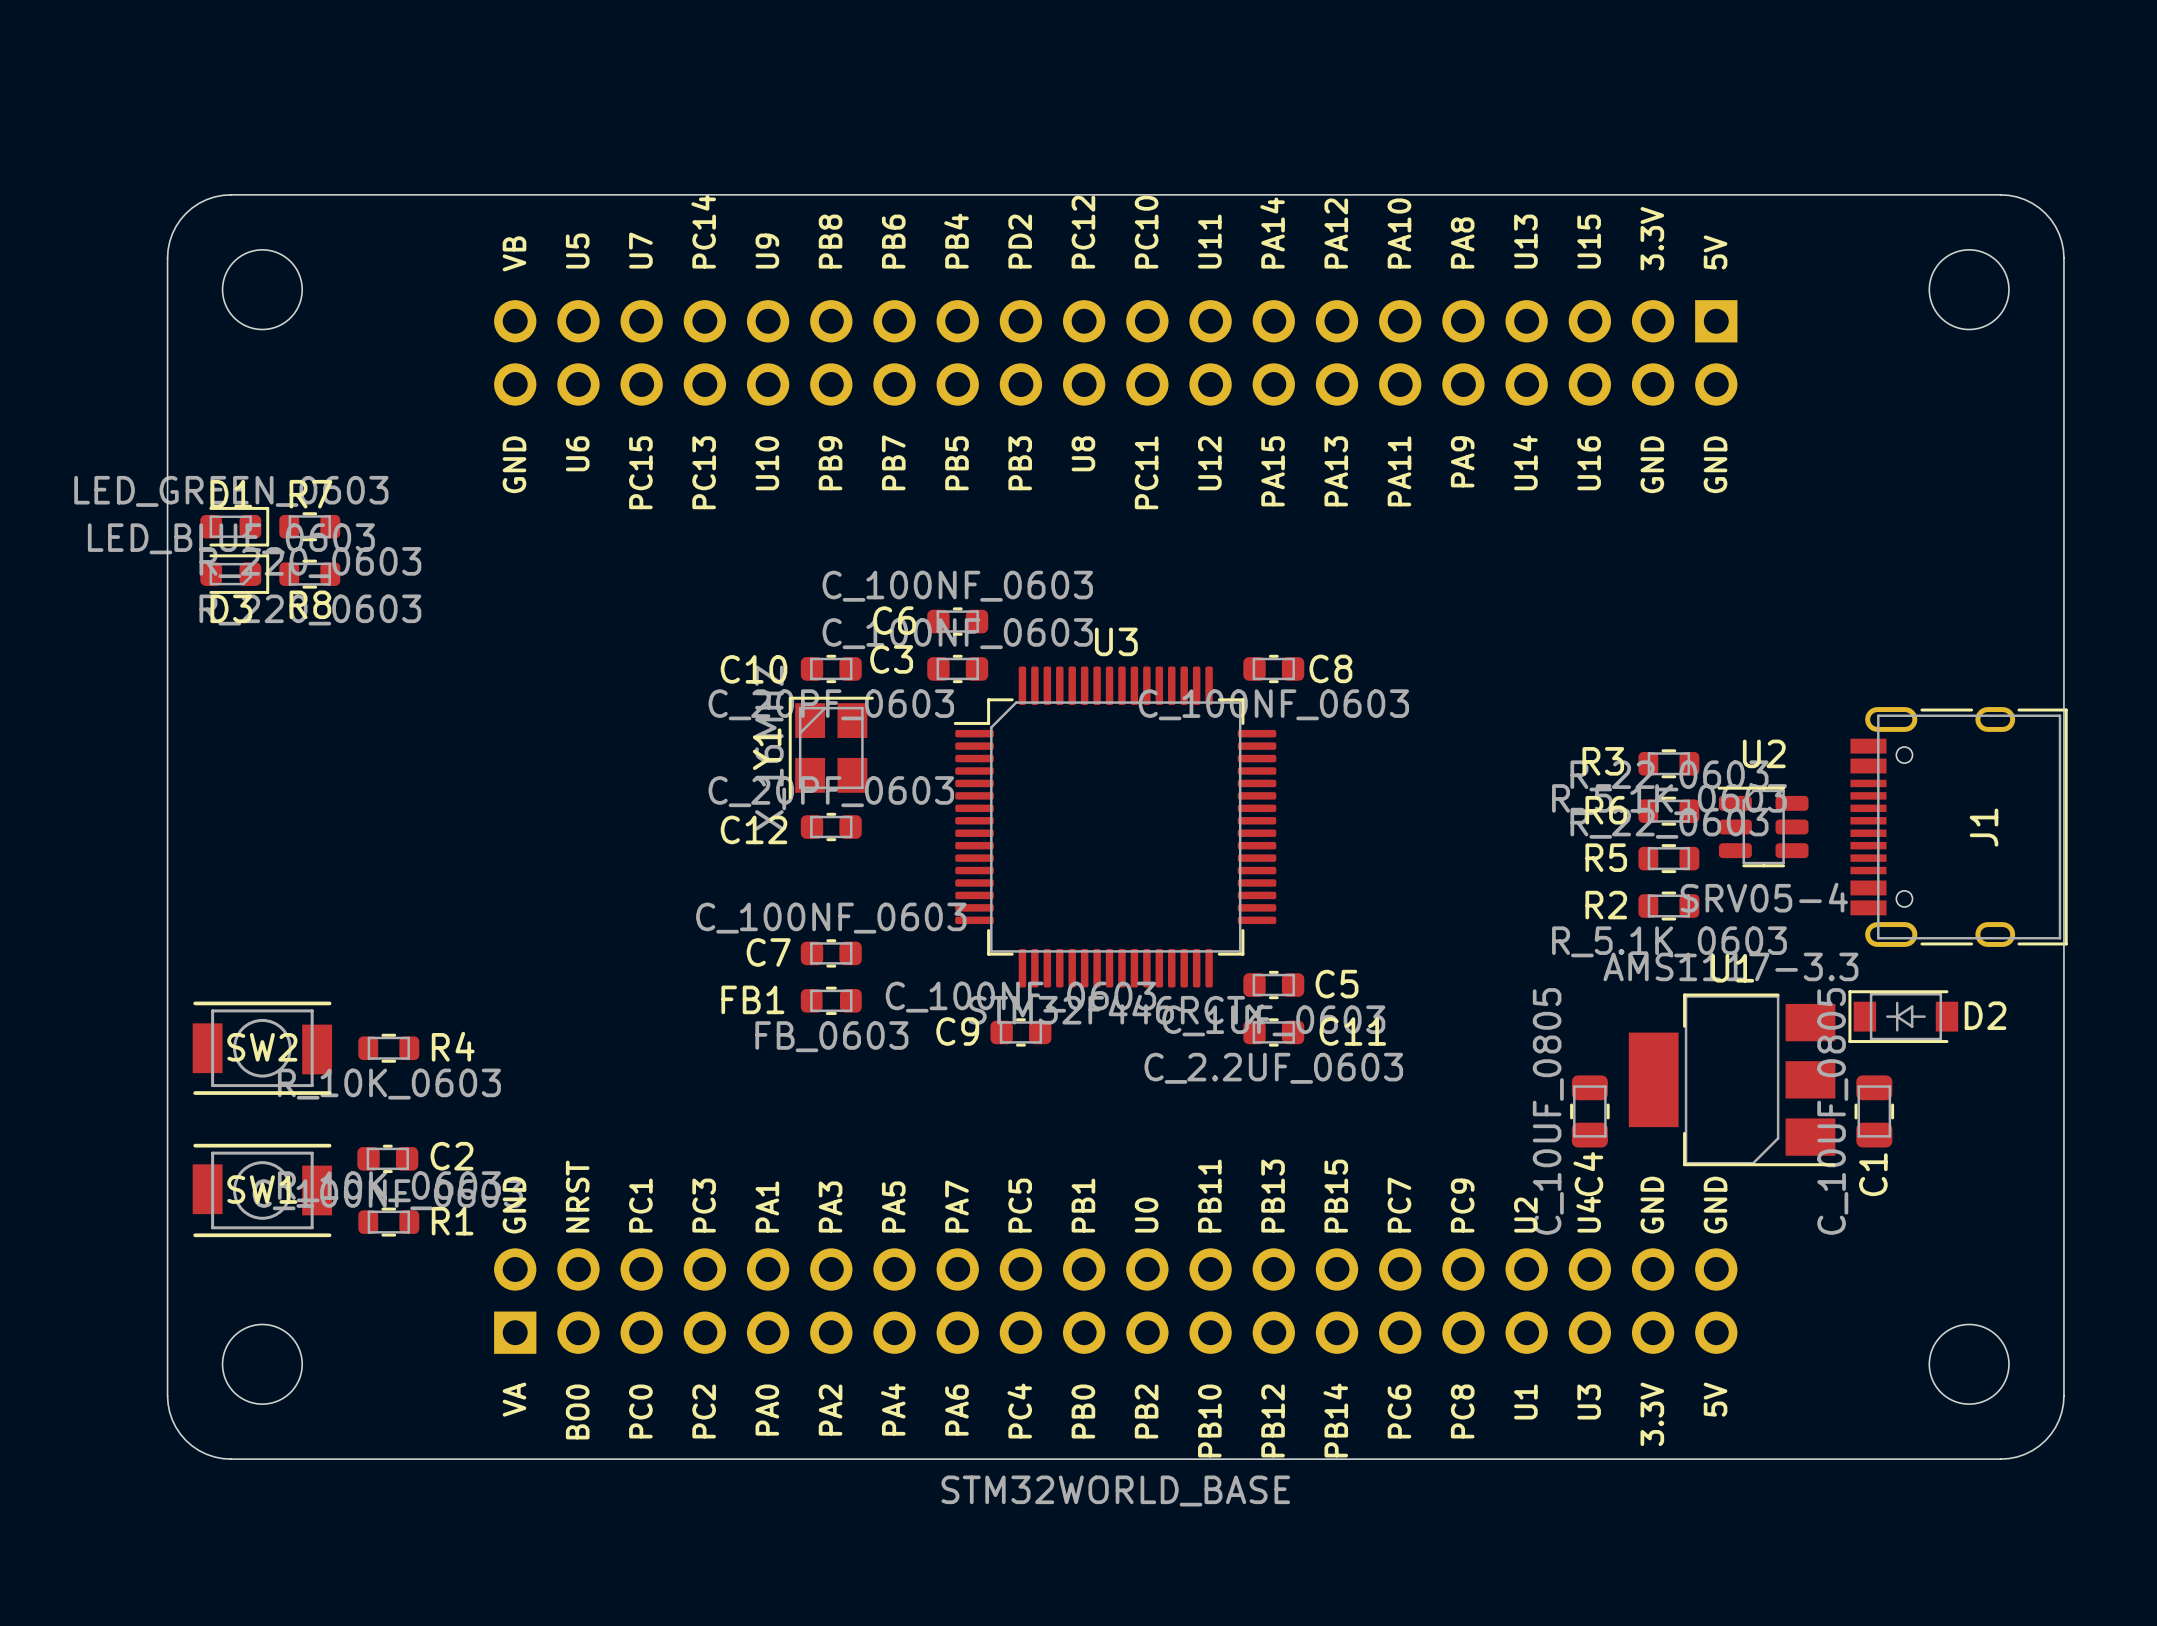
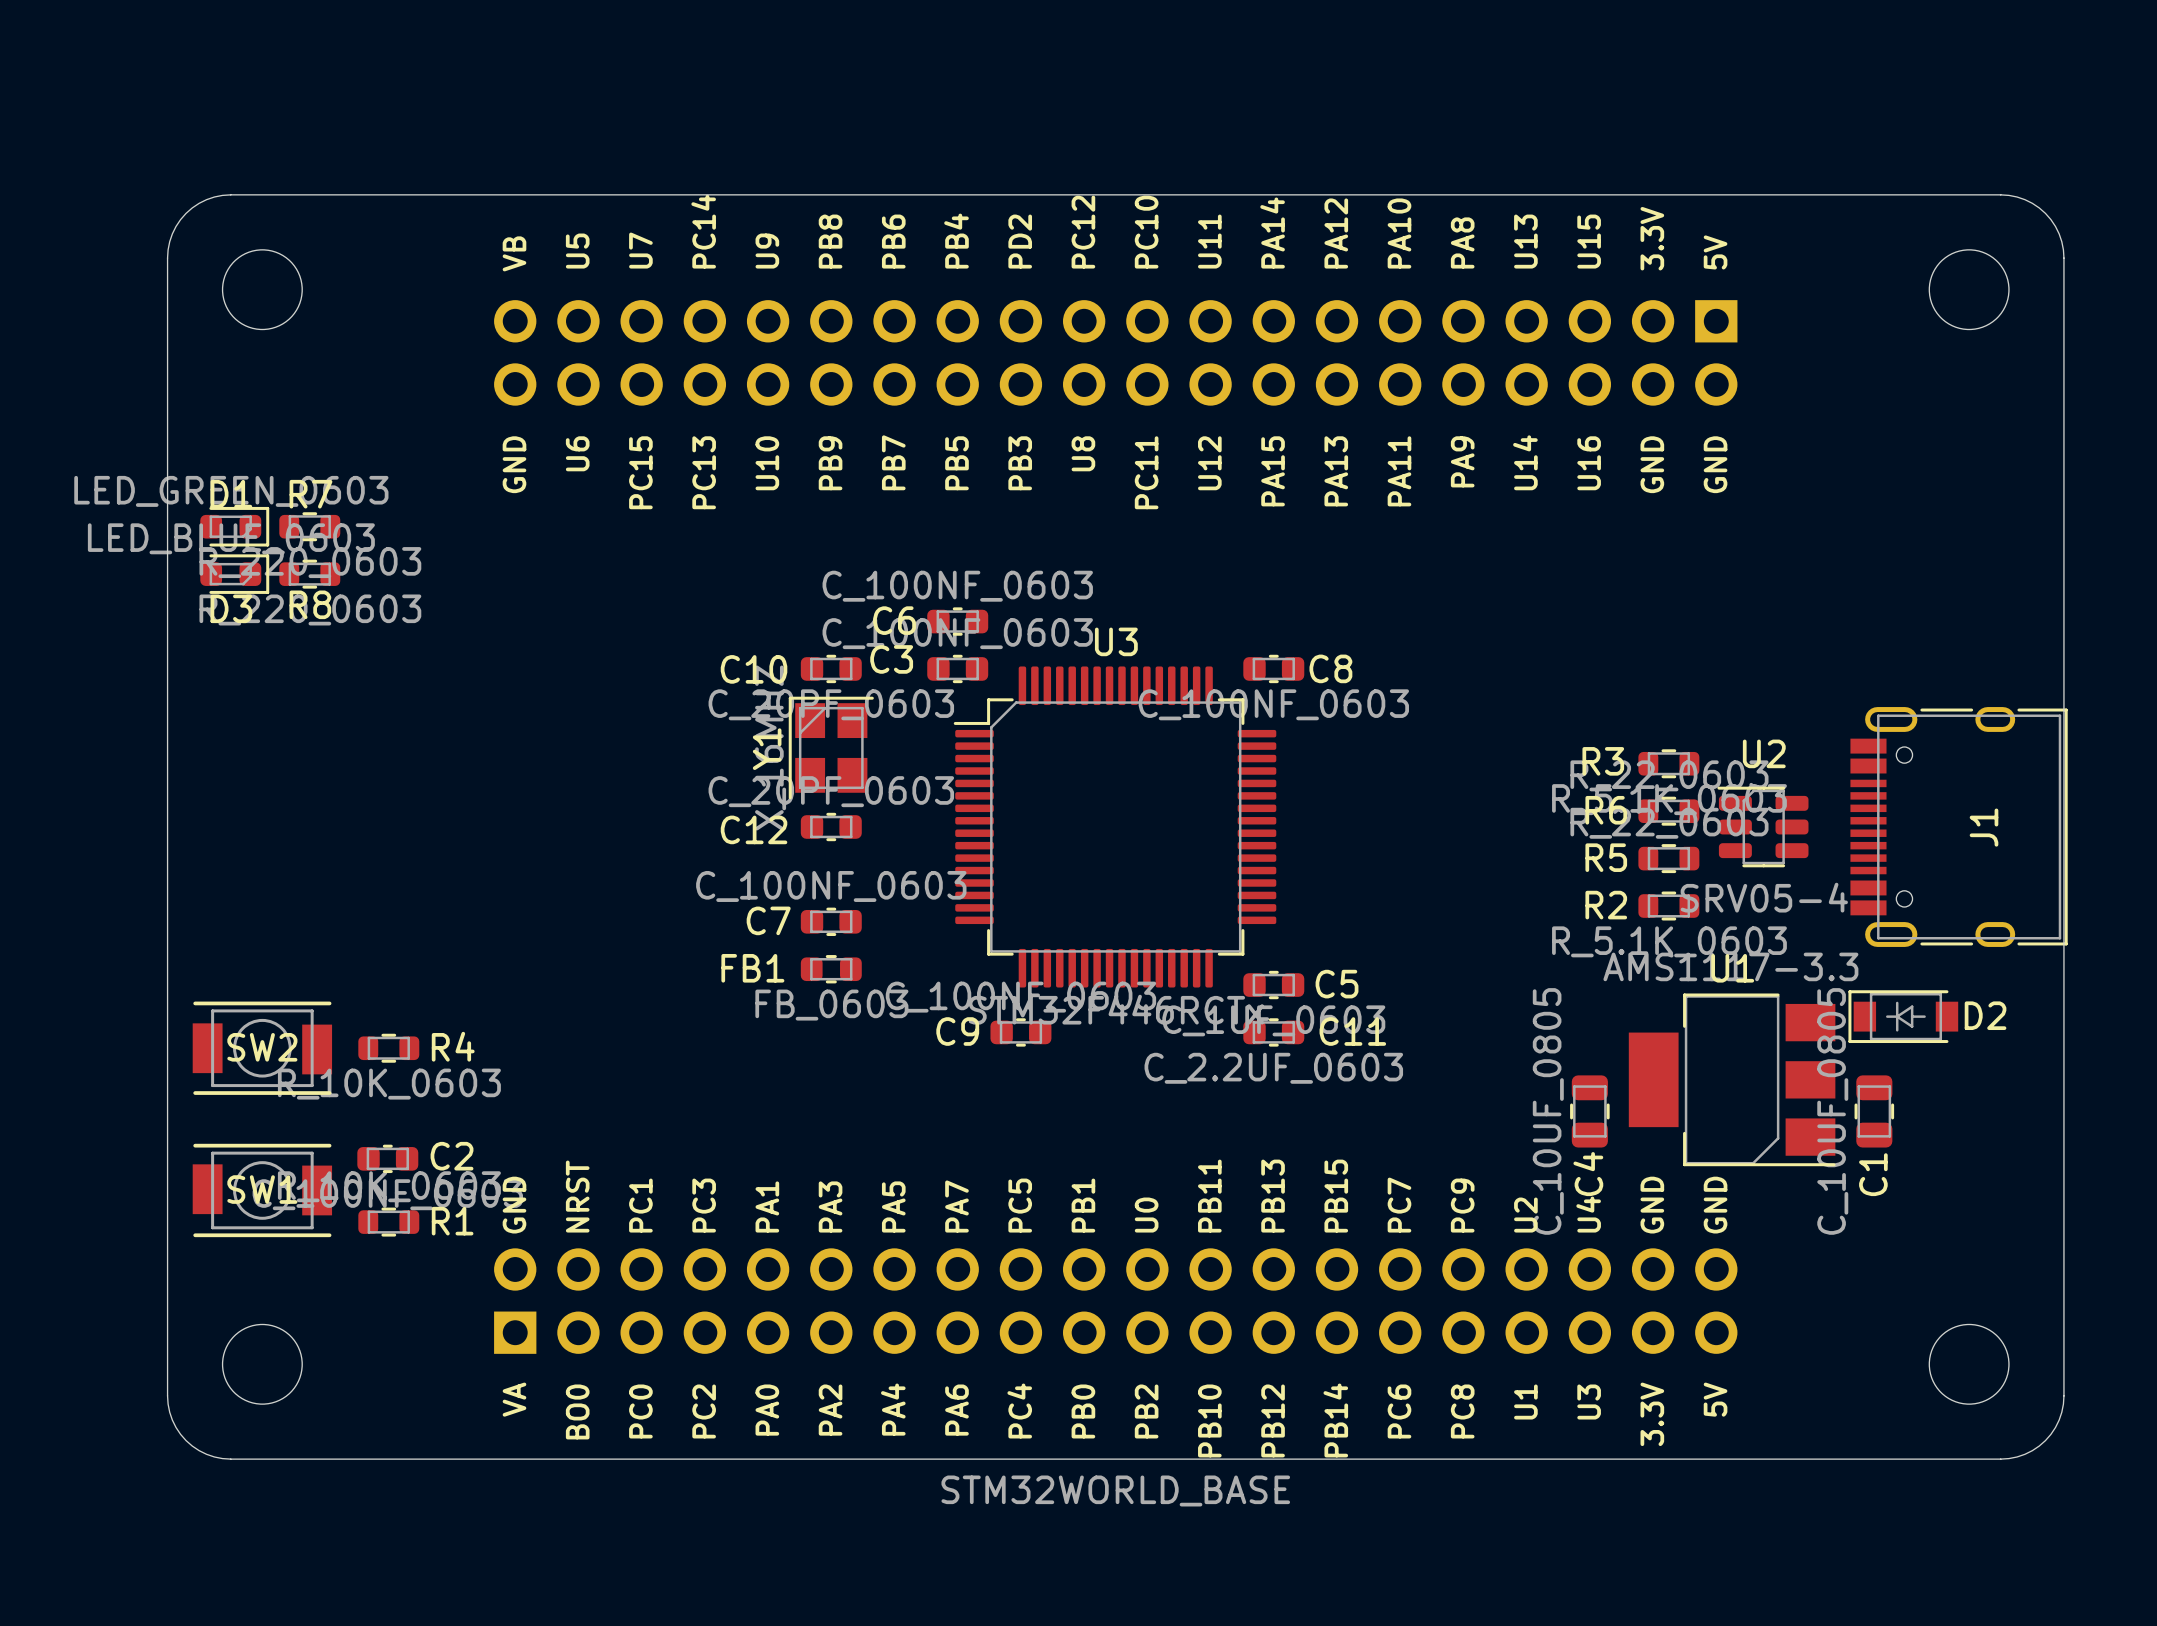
C7 position: (831, 953) -> (831, 921)
FB1 position: (831, 1000) -> (831, 969)

